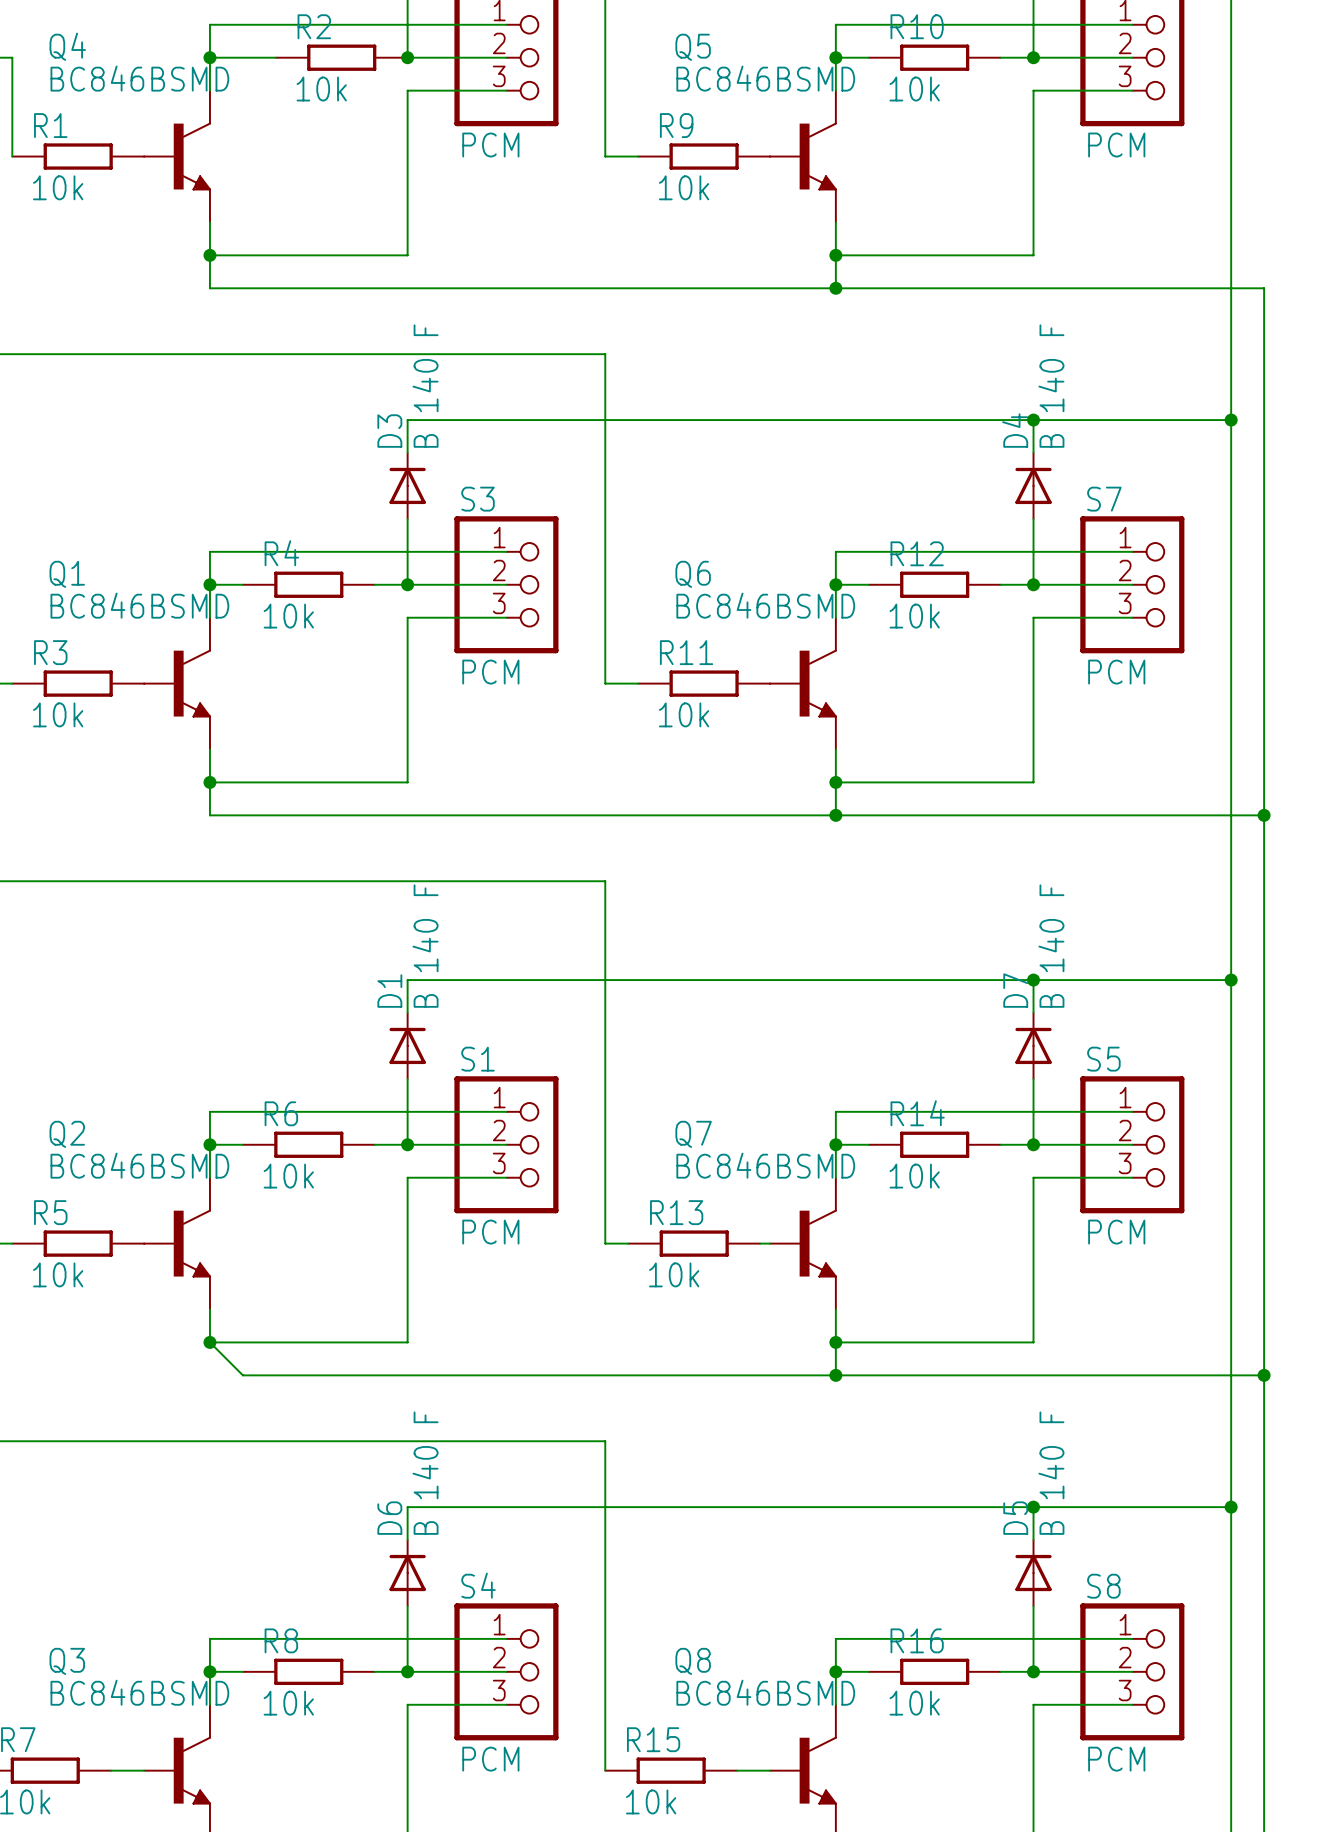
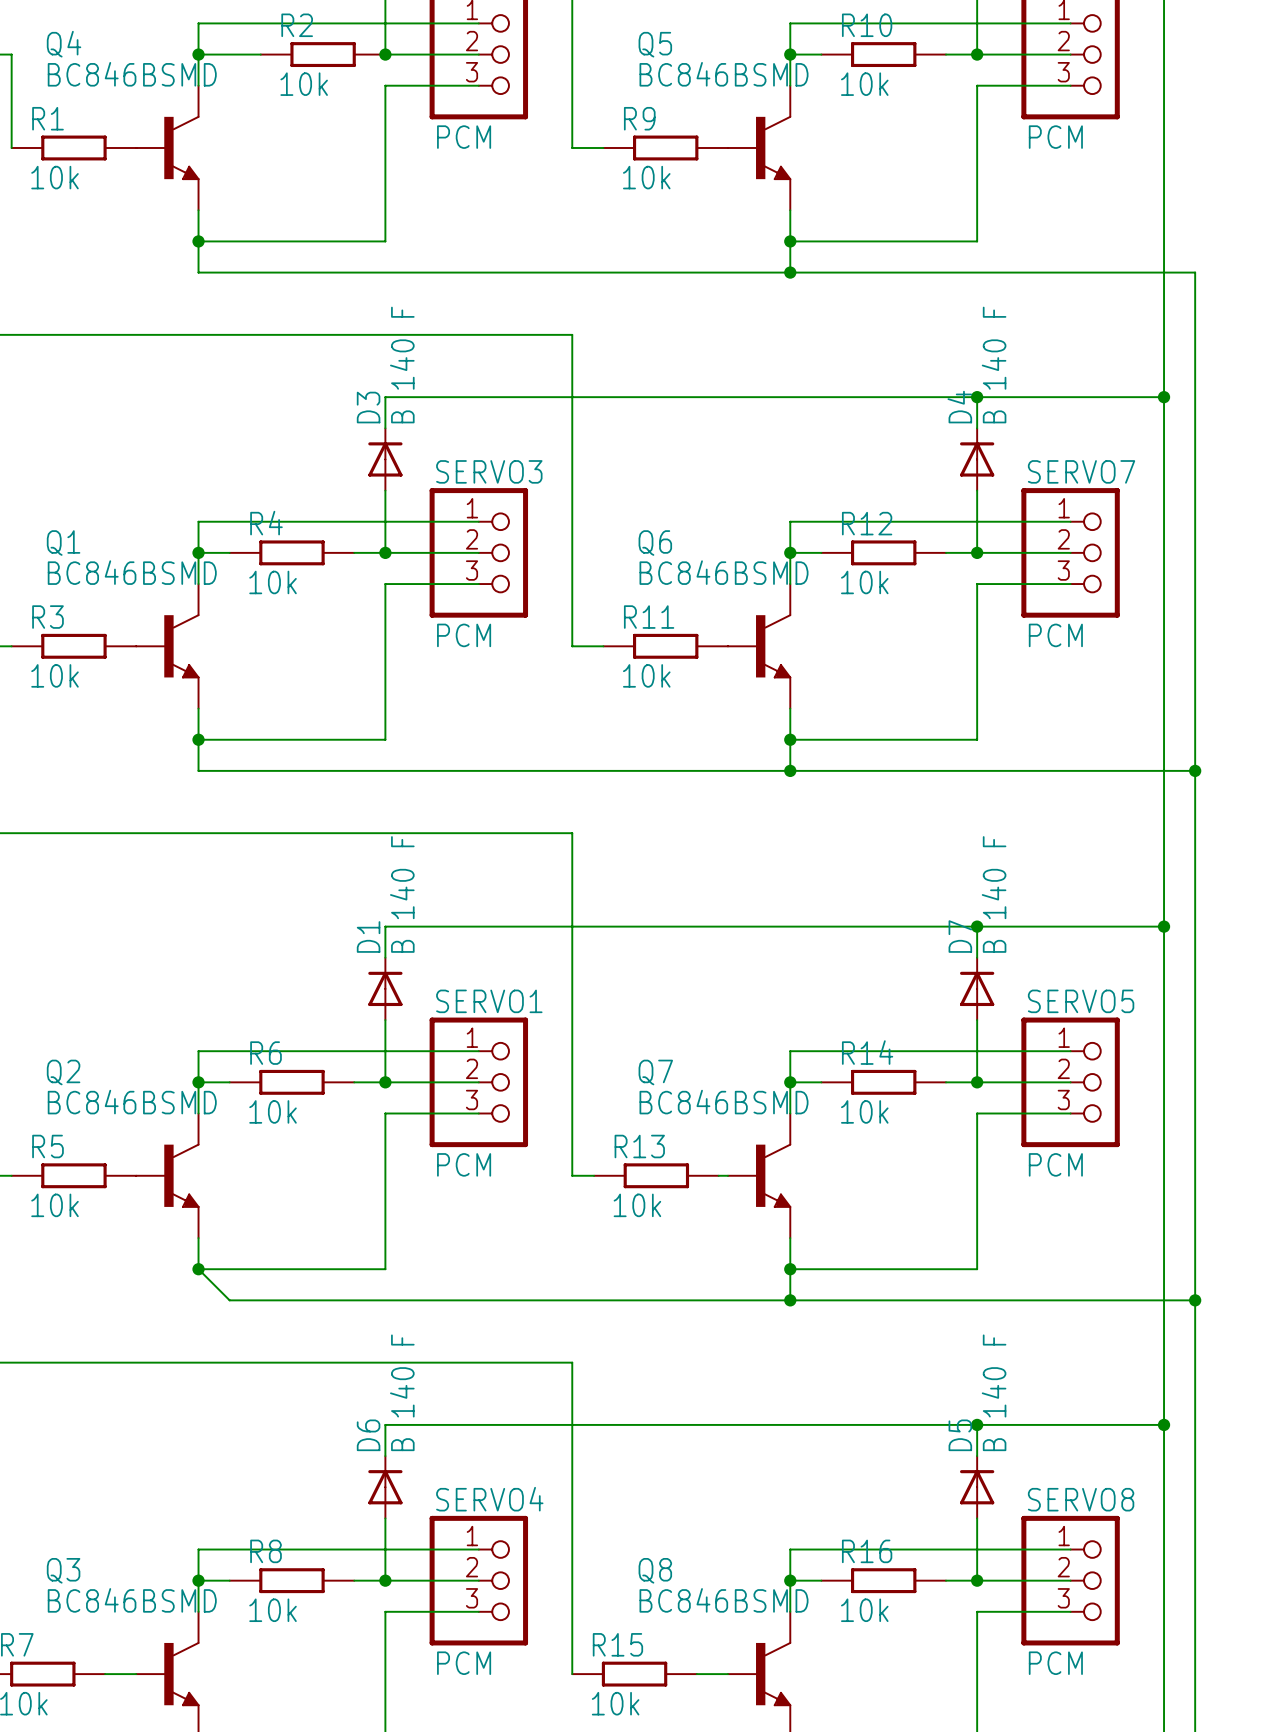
S3 name: S3 (478, 499) -> SERVO3 (489, 471)
S7 name: S7 (1104, 499) -> SERVO7 (1081, 471)
S1 name: S1 (478, 1059) -> SERVO1 (489, 1001)
S5 name: S5 (1103, 1059) -> SERVO5 (1081, 1001)
S4 name: S4 (478, 1585) -> SERVO4 (489, 1499)
S8 name: S8 (1103, 1586) -> SERVO8 (1081, 1499)

